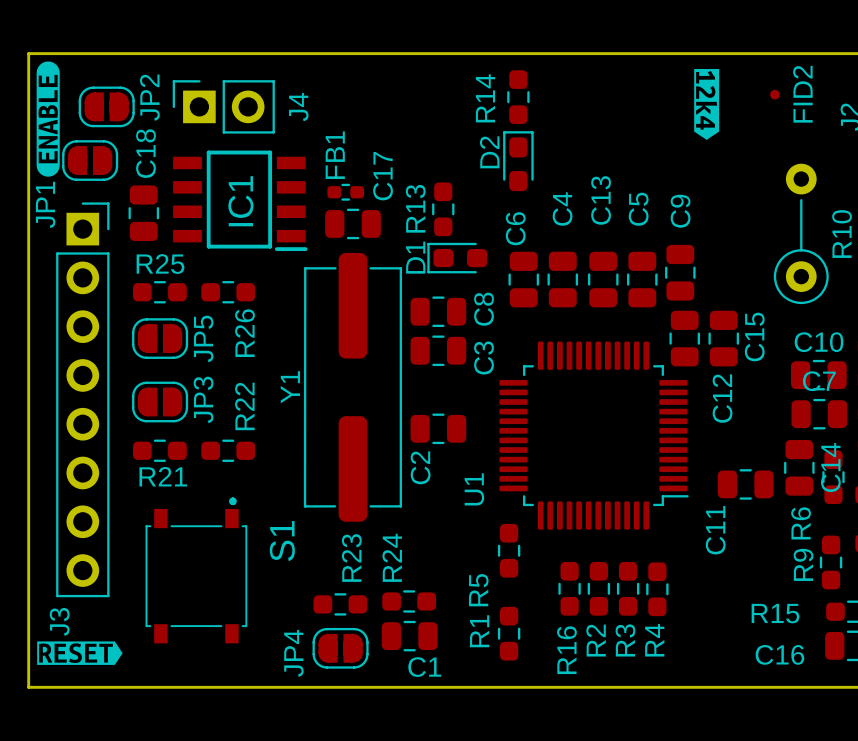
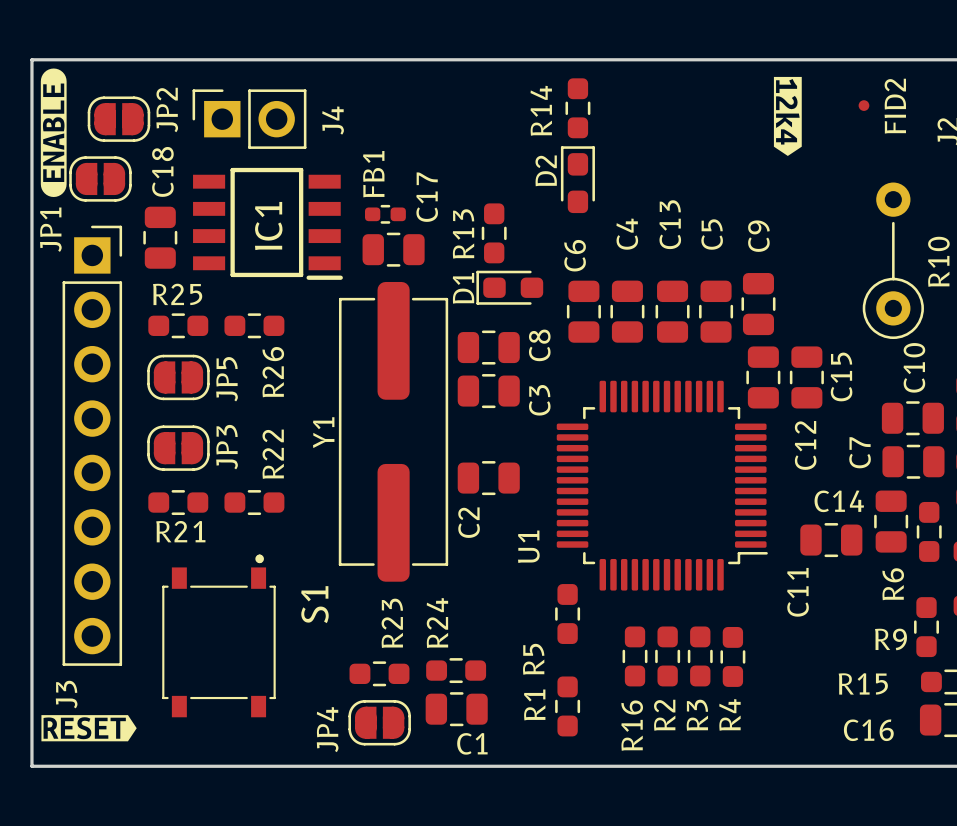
C10 name rotation: 0° (819, 342) -> 90° counterclockwise (914, 367)
C7 name rotation: 0° (819, 381) -> 90° counterclockwise (860, 452)
C7 name position: C7 (819, 381) -> C7 (860, 452)
C14 name rotation: 0° (830, 467) -> 90° clockwise (839, 501)
C14 name position: C14 (830, 467) -> C14 (839, 501)
R9 name rotation: 0° (803, 564) -> 90° clockwise (891, 639)

